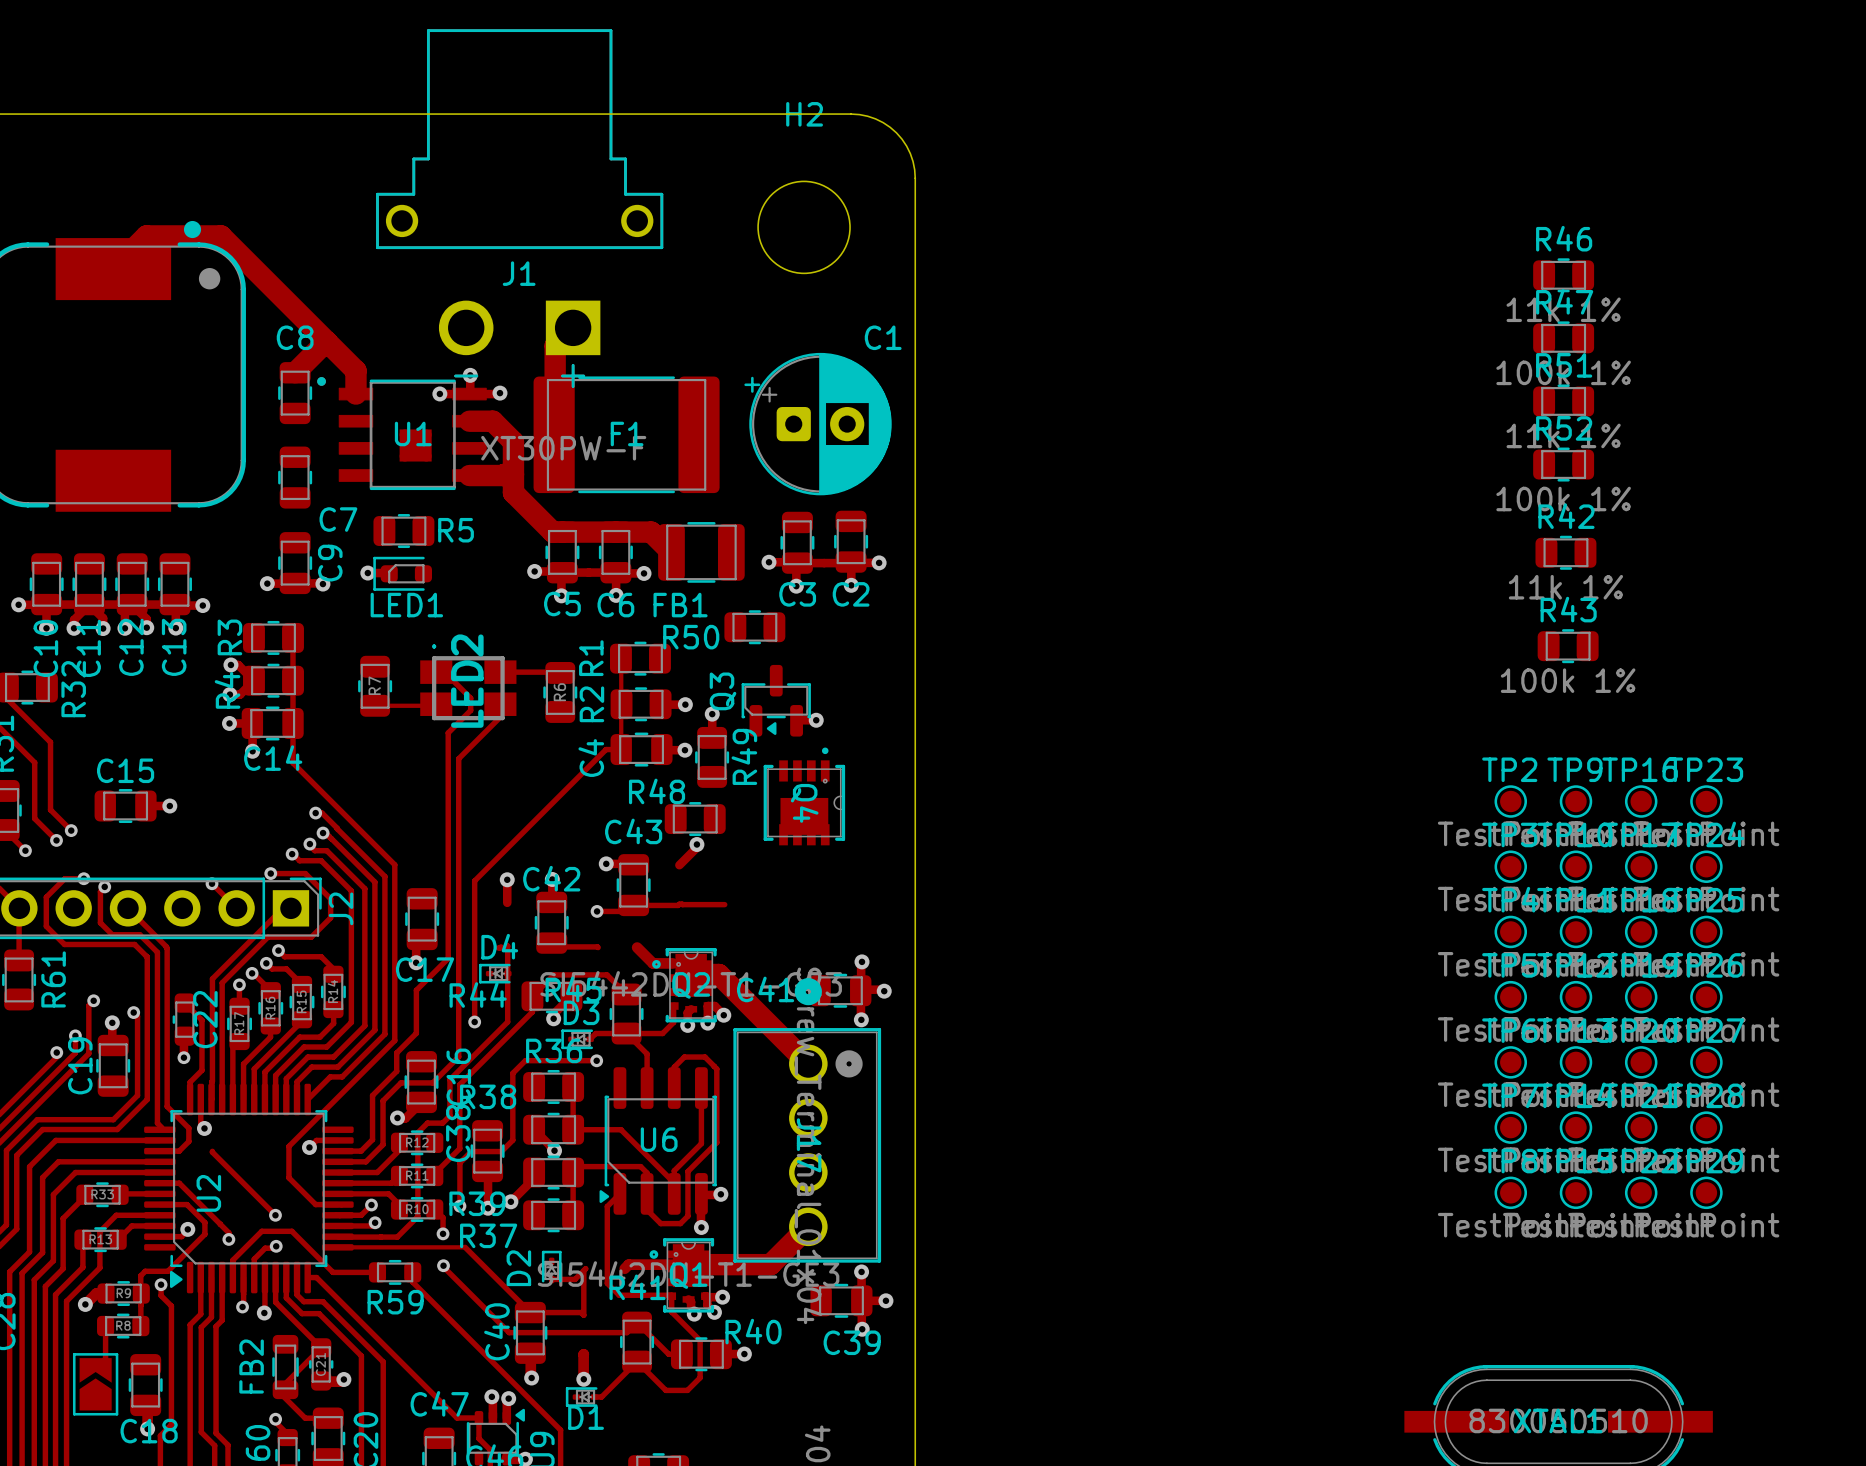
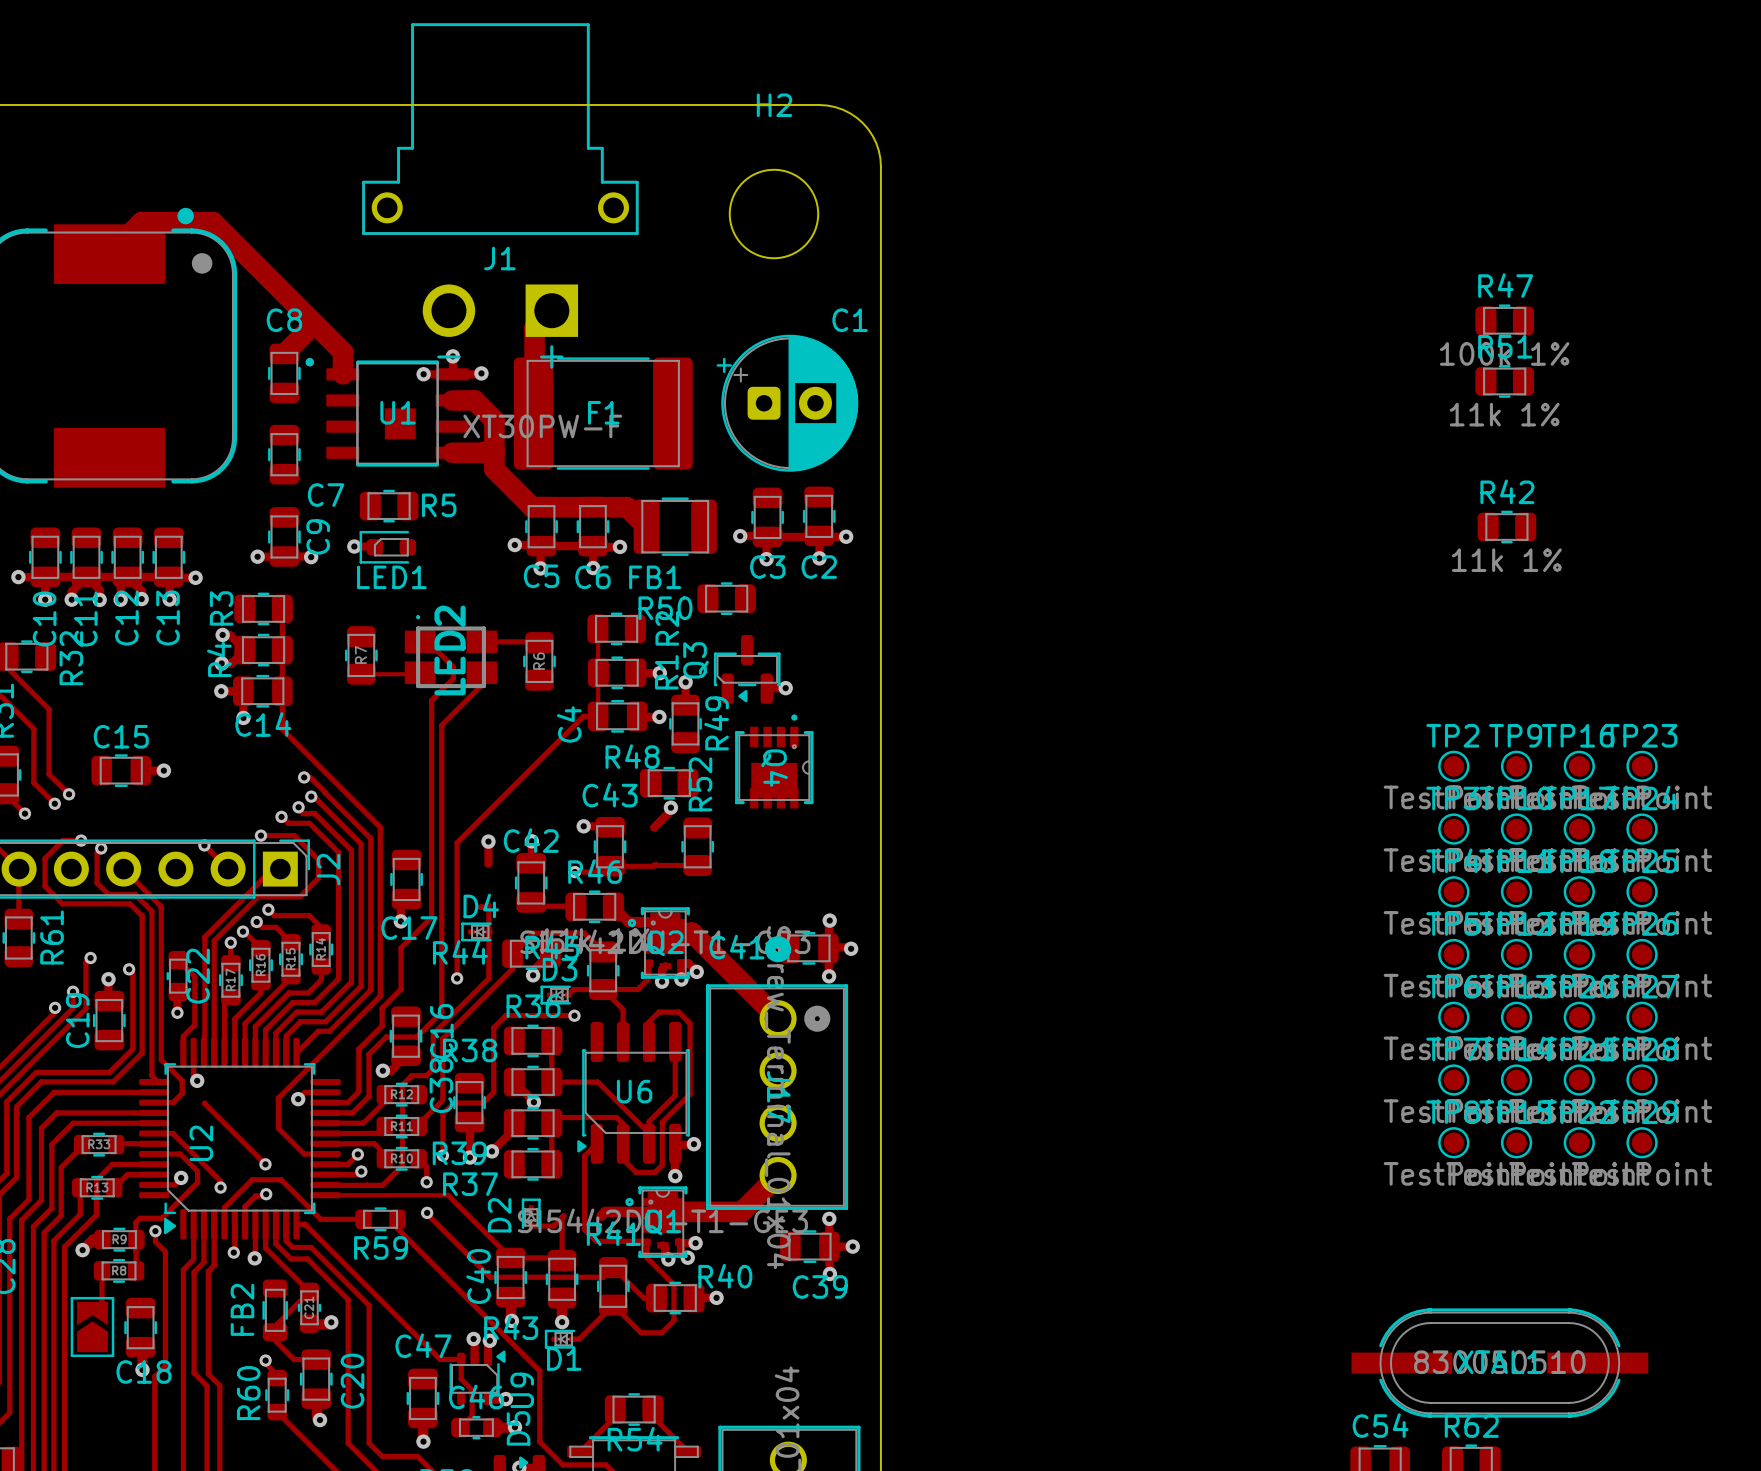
R46 position: (1563, 275) -> (594, 906)
R52 rotation: 0° (1563, 464) -> 90° clockwise (697, 846)
R52 position: (1563, 464) -> (697, 846)
R52 value: 100k 1% (1563, 499) -> none
R43 name position: R43 (1568, 609) -> R43 (511, 1327)
R43 rotation: 0° (1568, 646) -> 90° clockwise (562, 1279)
R43 position: (1568, 646) -> (562, 1279)
R1 name: R1 (591, 658) -> R2 (667, 628)
R43 value: 100k 1% (1568, 680) -> none
R2 name: R2 (591, 704) -> R1 (666, 672)

